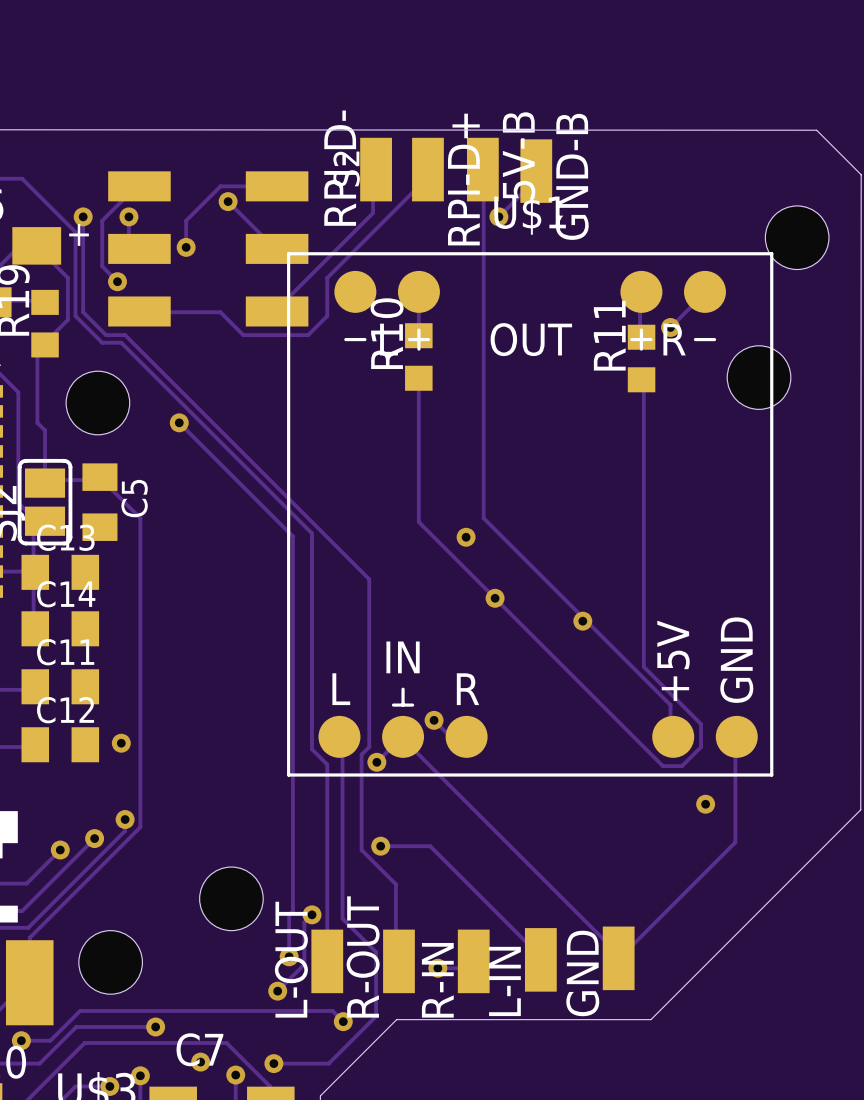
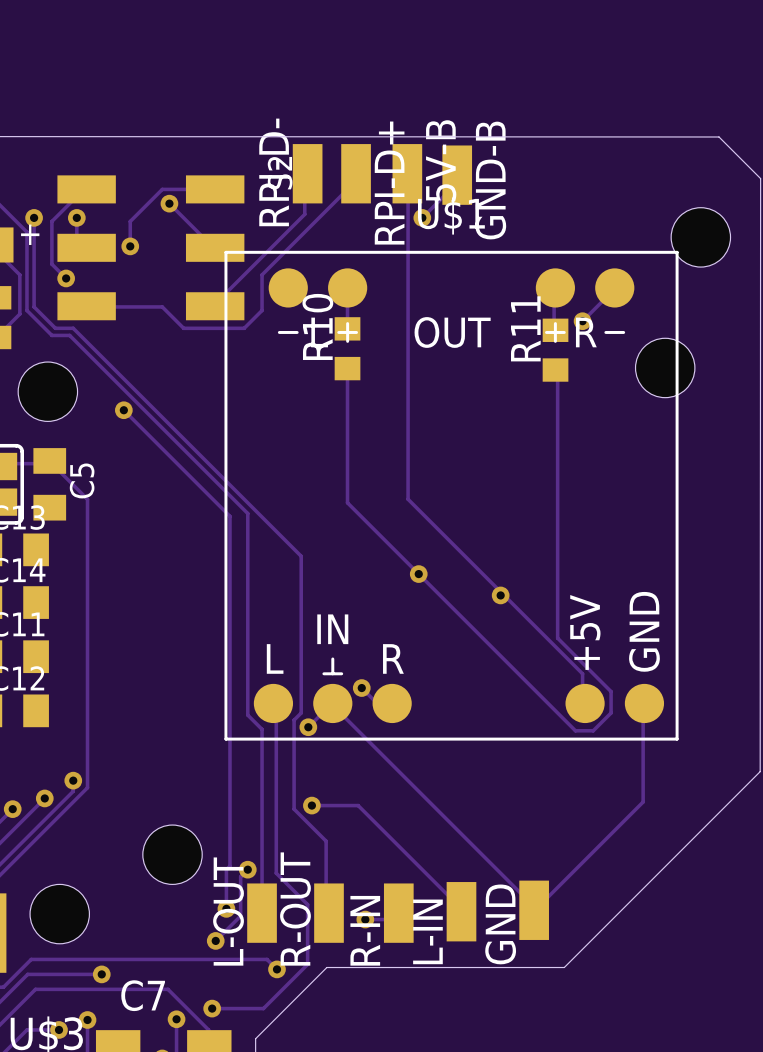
via: (466, 537) -> none
via: (121, 743) -> none
via: (705, 804) -> none
via: (200, 1062) -> none

